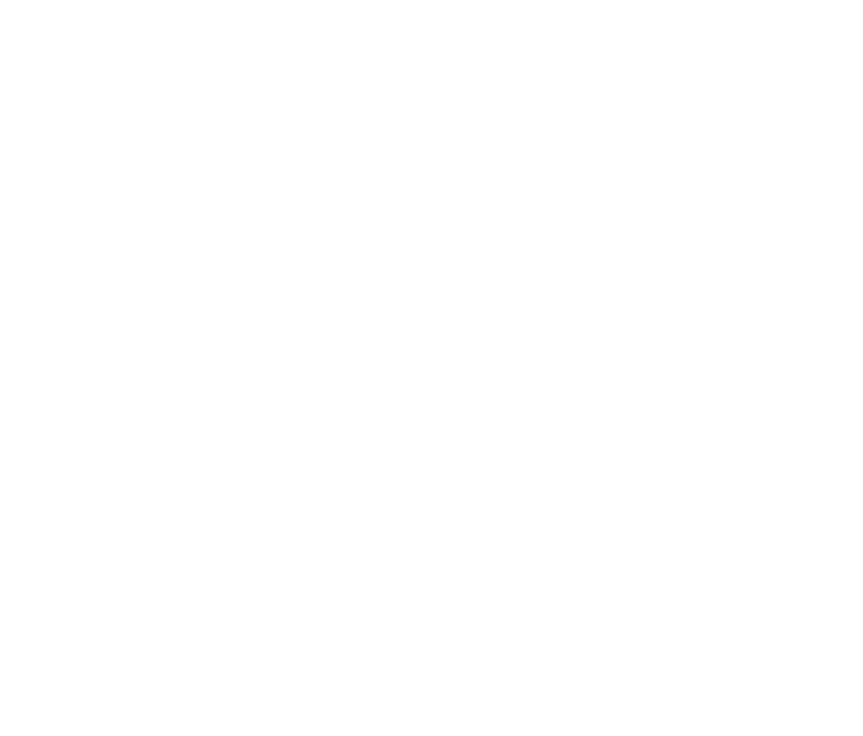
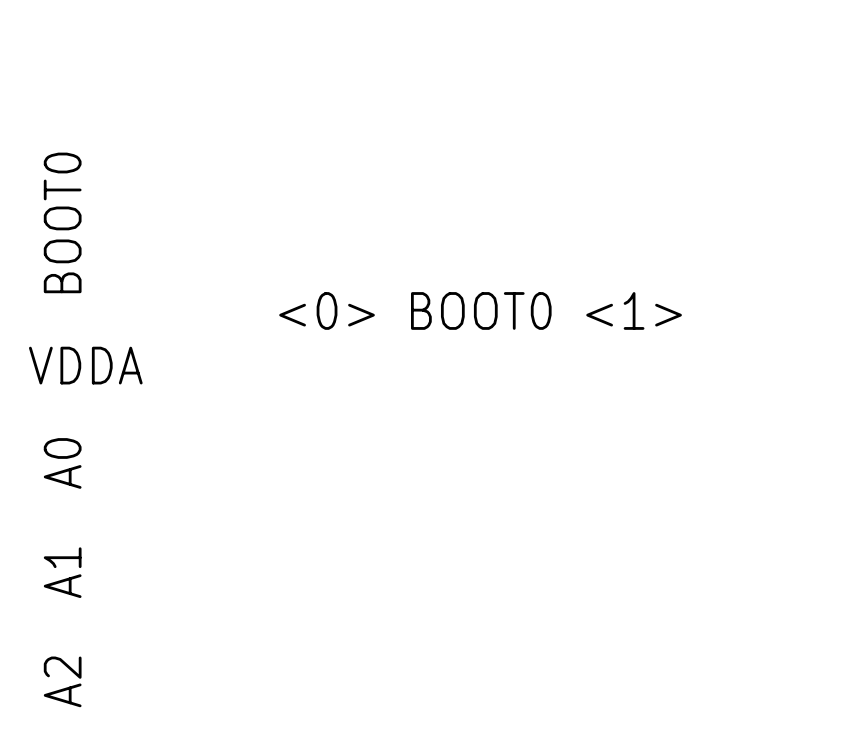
text: none -> BOOT0 (62, 222)
text: none -> <0> BOOT0 <1> (480, 310)
text: none -> VDDA (85, 365)
text: none -> A0 (62, 463)
text: none -> A1 (62, 572)
text: none -> A2 (62, 681)

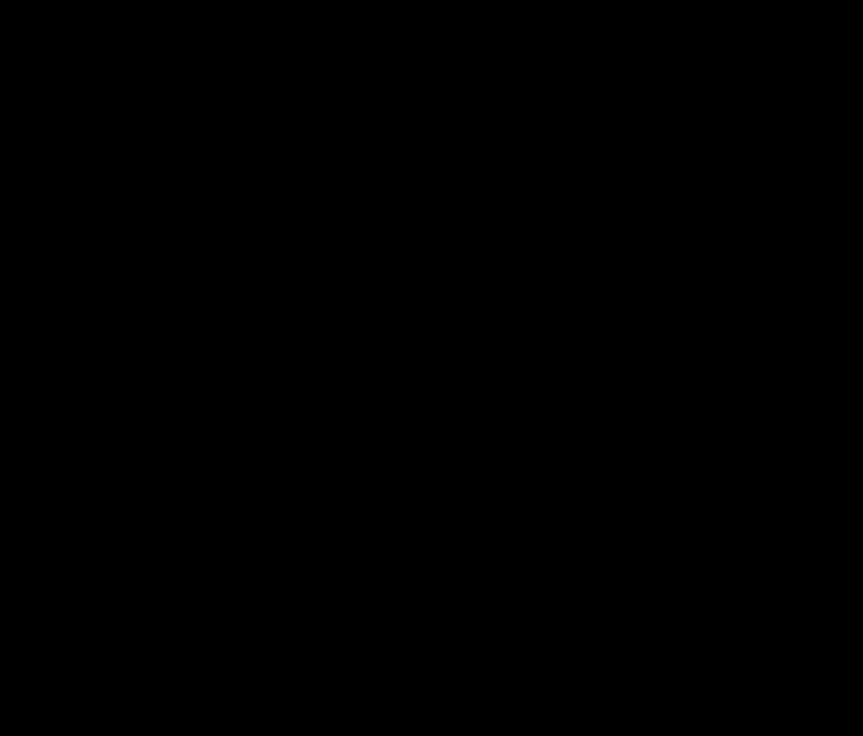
text: BOOT0 (62, 222) -> none
text: <0> BOOT0 <1> (480, 310) -> none
text: VDDA (85, 365) -> none
text: A0 (62, 463) -> none
text: A1 (62, 572) -> none
text: A2 (62, 681) -> none

